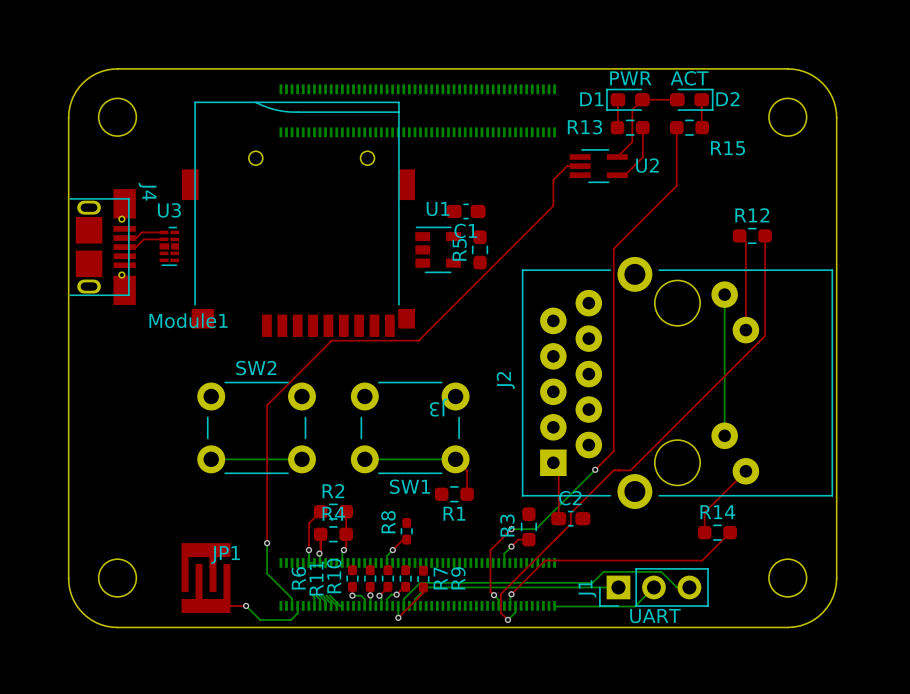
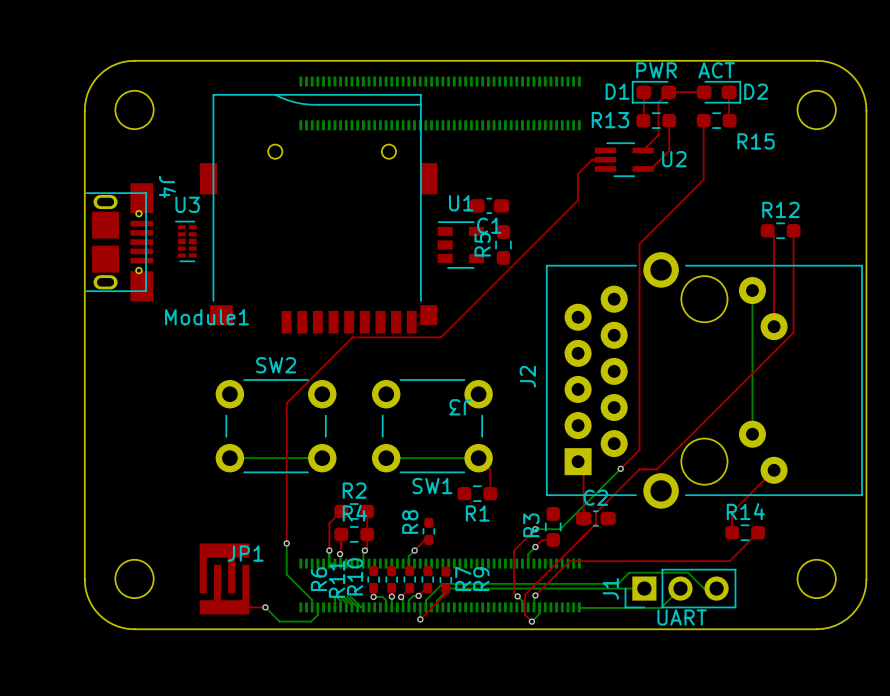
U3 footprint: [159, 226, 180, 267] -> [175, 220, 197, 263]
top track: (163, 232) (141, 232) (136, 238) (124, 238) -> none
top track: (163, 239) (143, 239) (136, 247) (124, 247) -> none

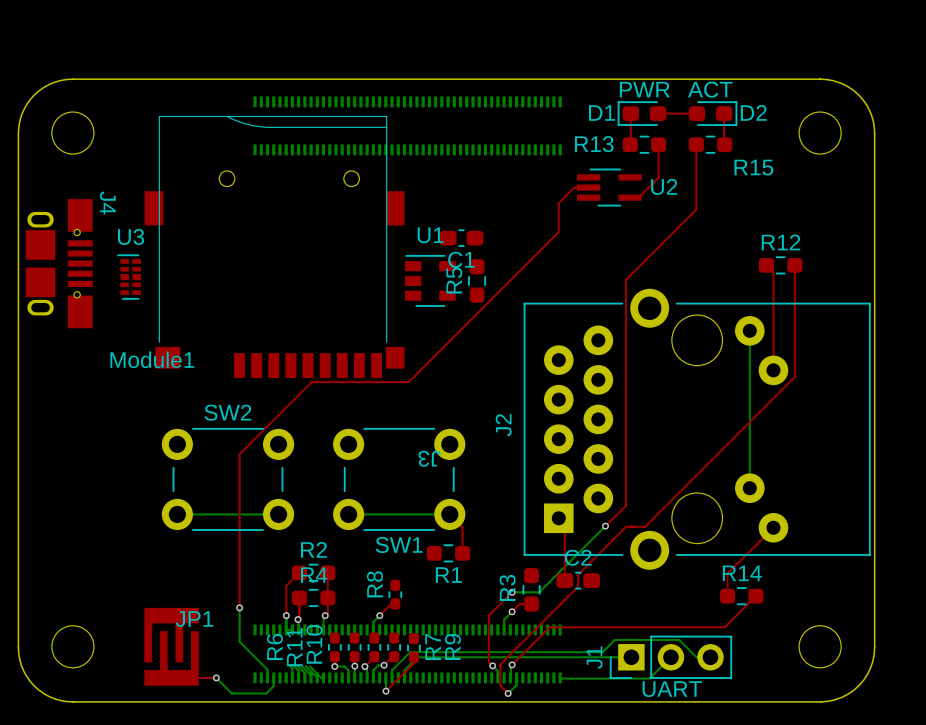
top track: (668, 92) (658, 102) (658, 135) (643, 150) -> none
J4 footprint: [86, 183, 154, 302] -> [25, 199, 93, 329]

